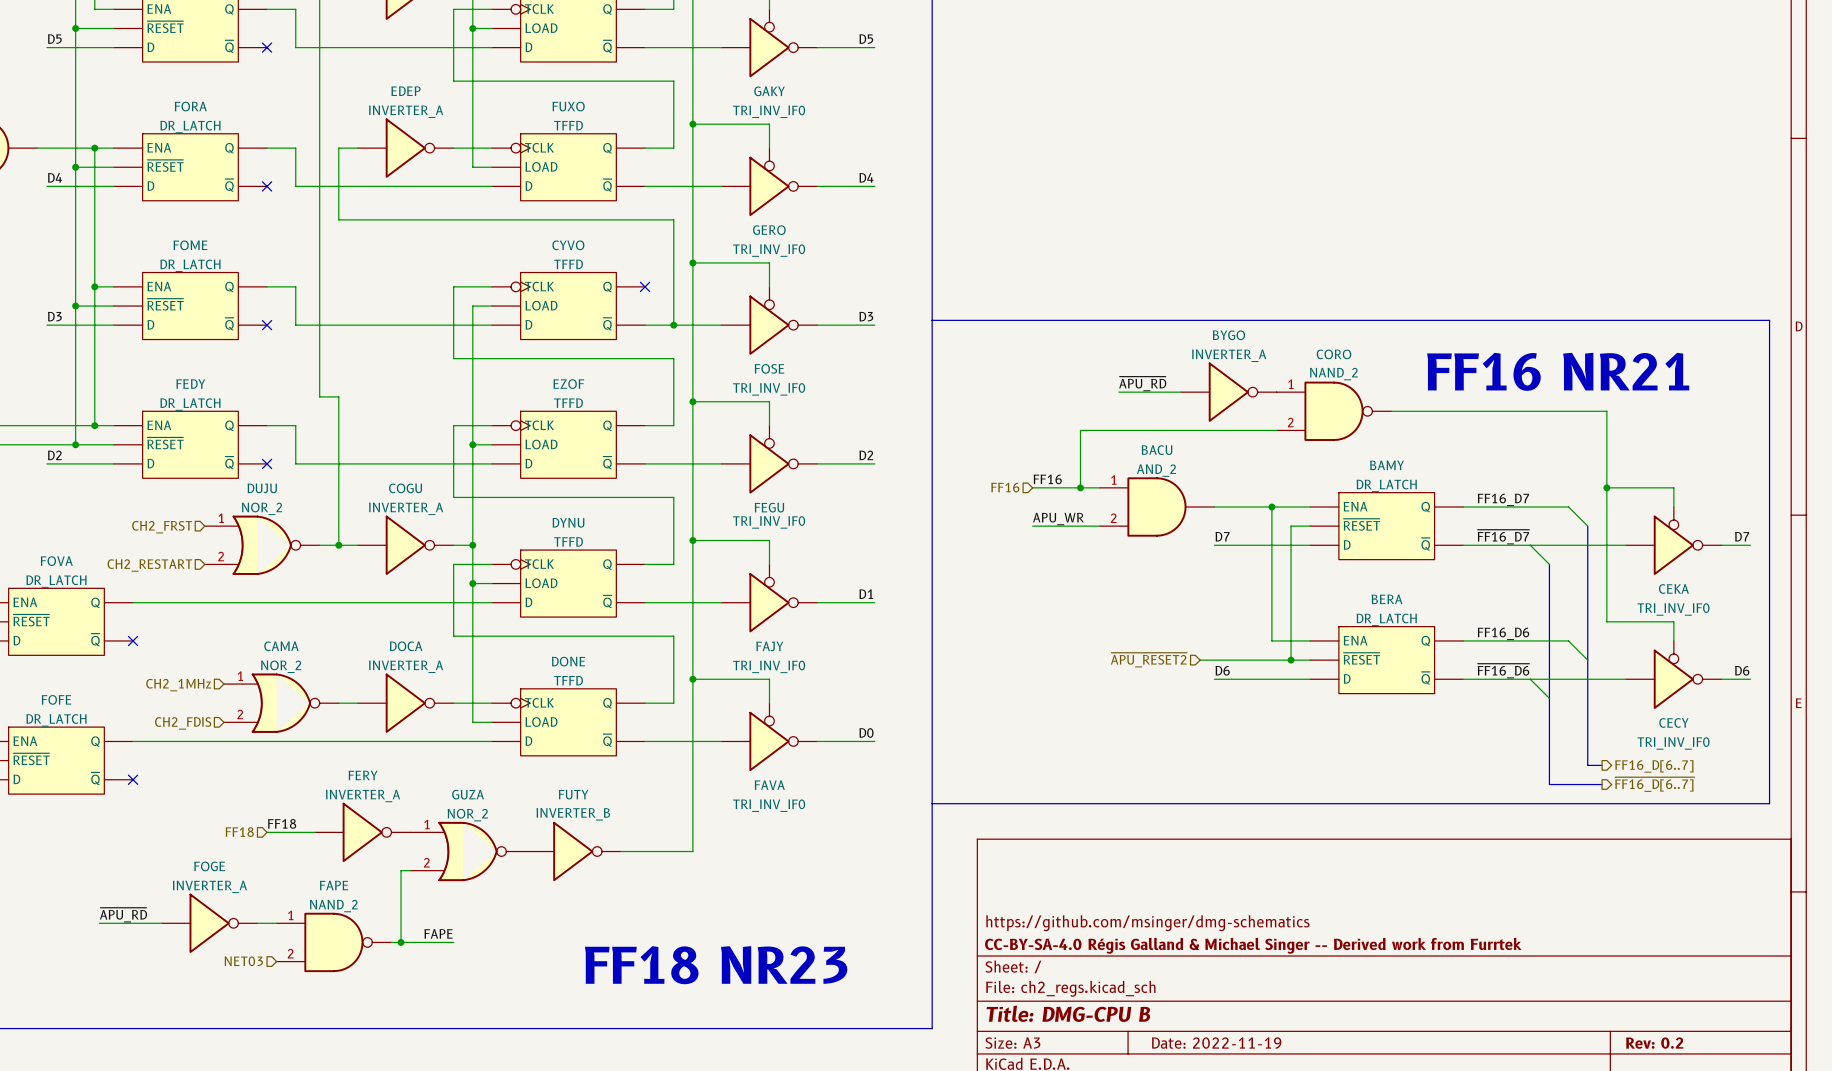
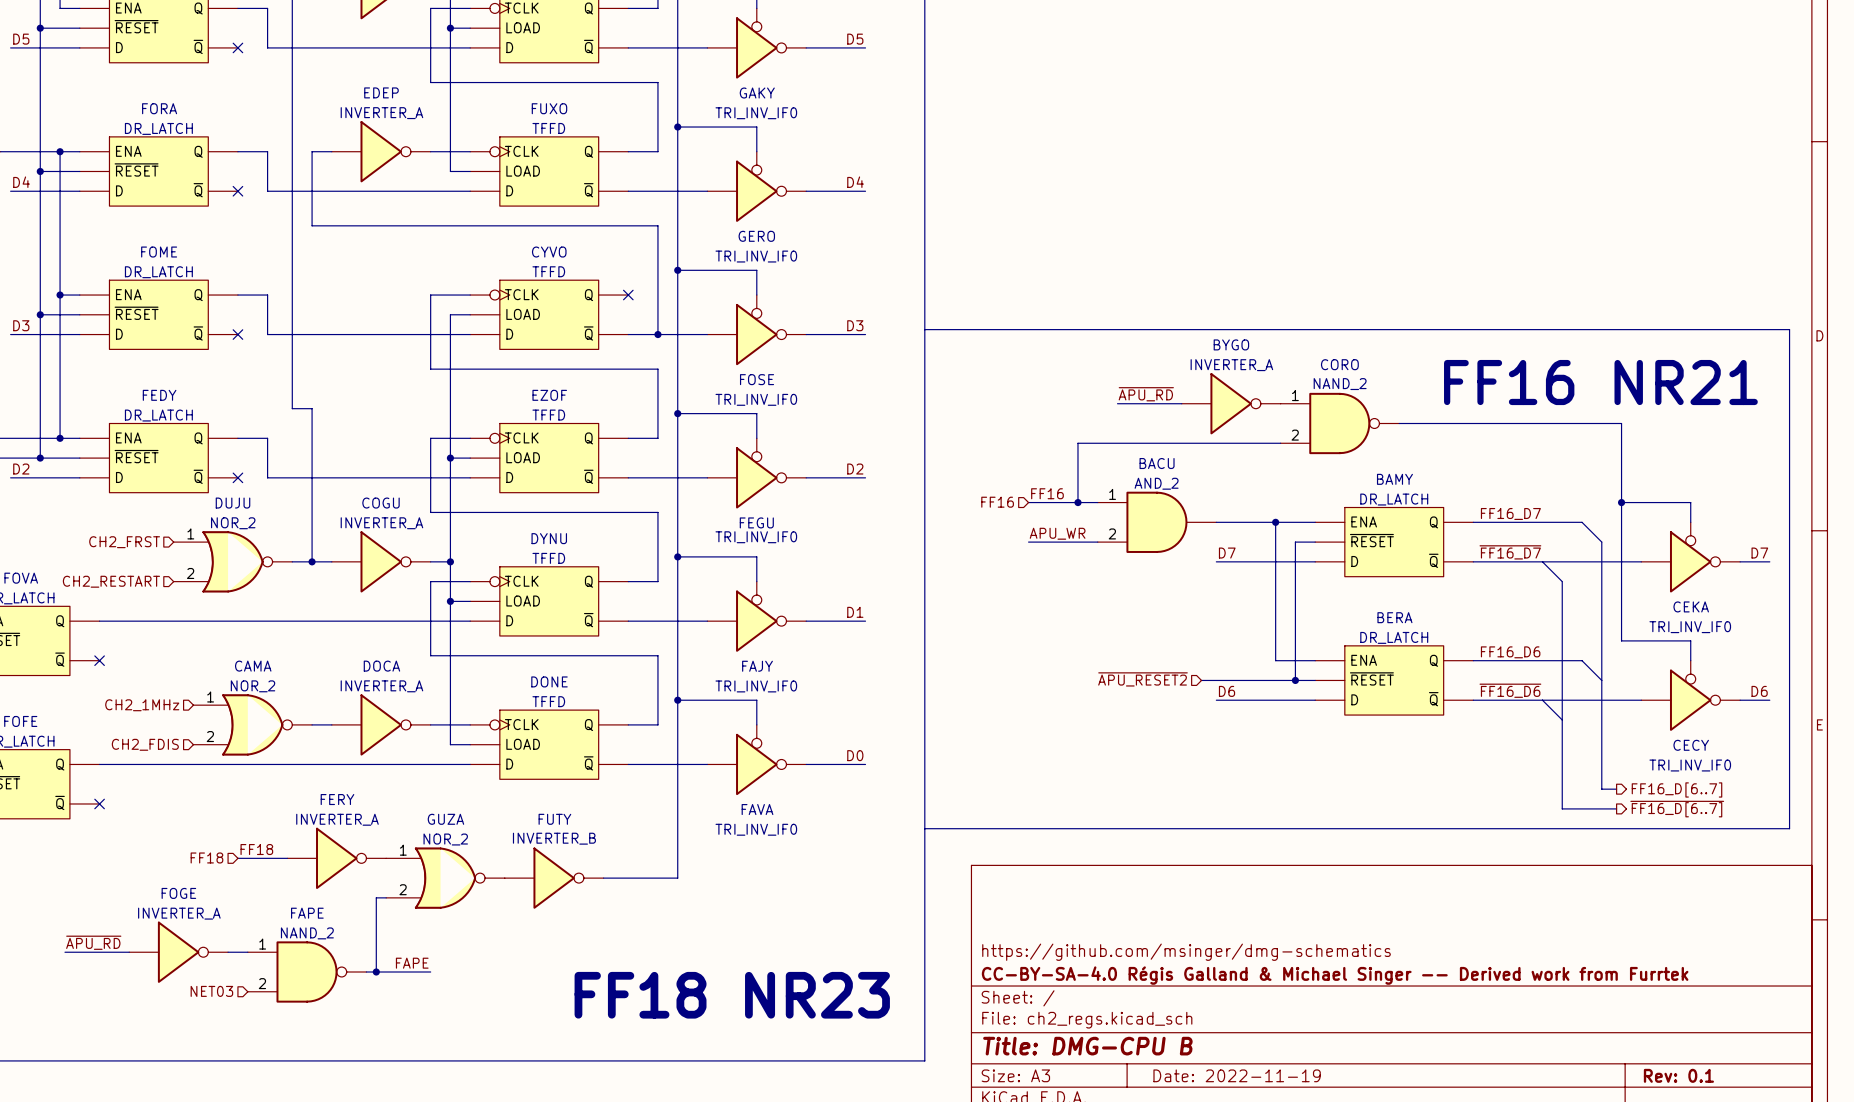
title block: Rev: 0.2 (1654, 1043) -> Rev: 0.1 (1678, 1075)

